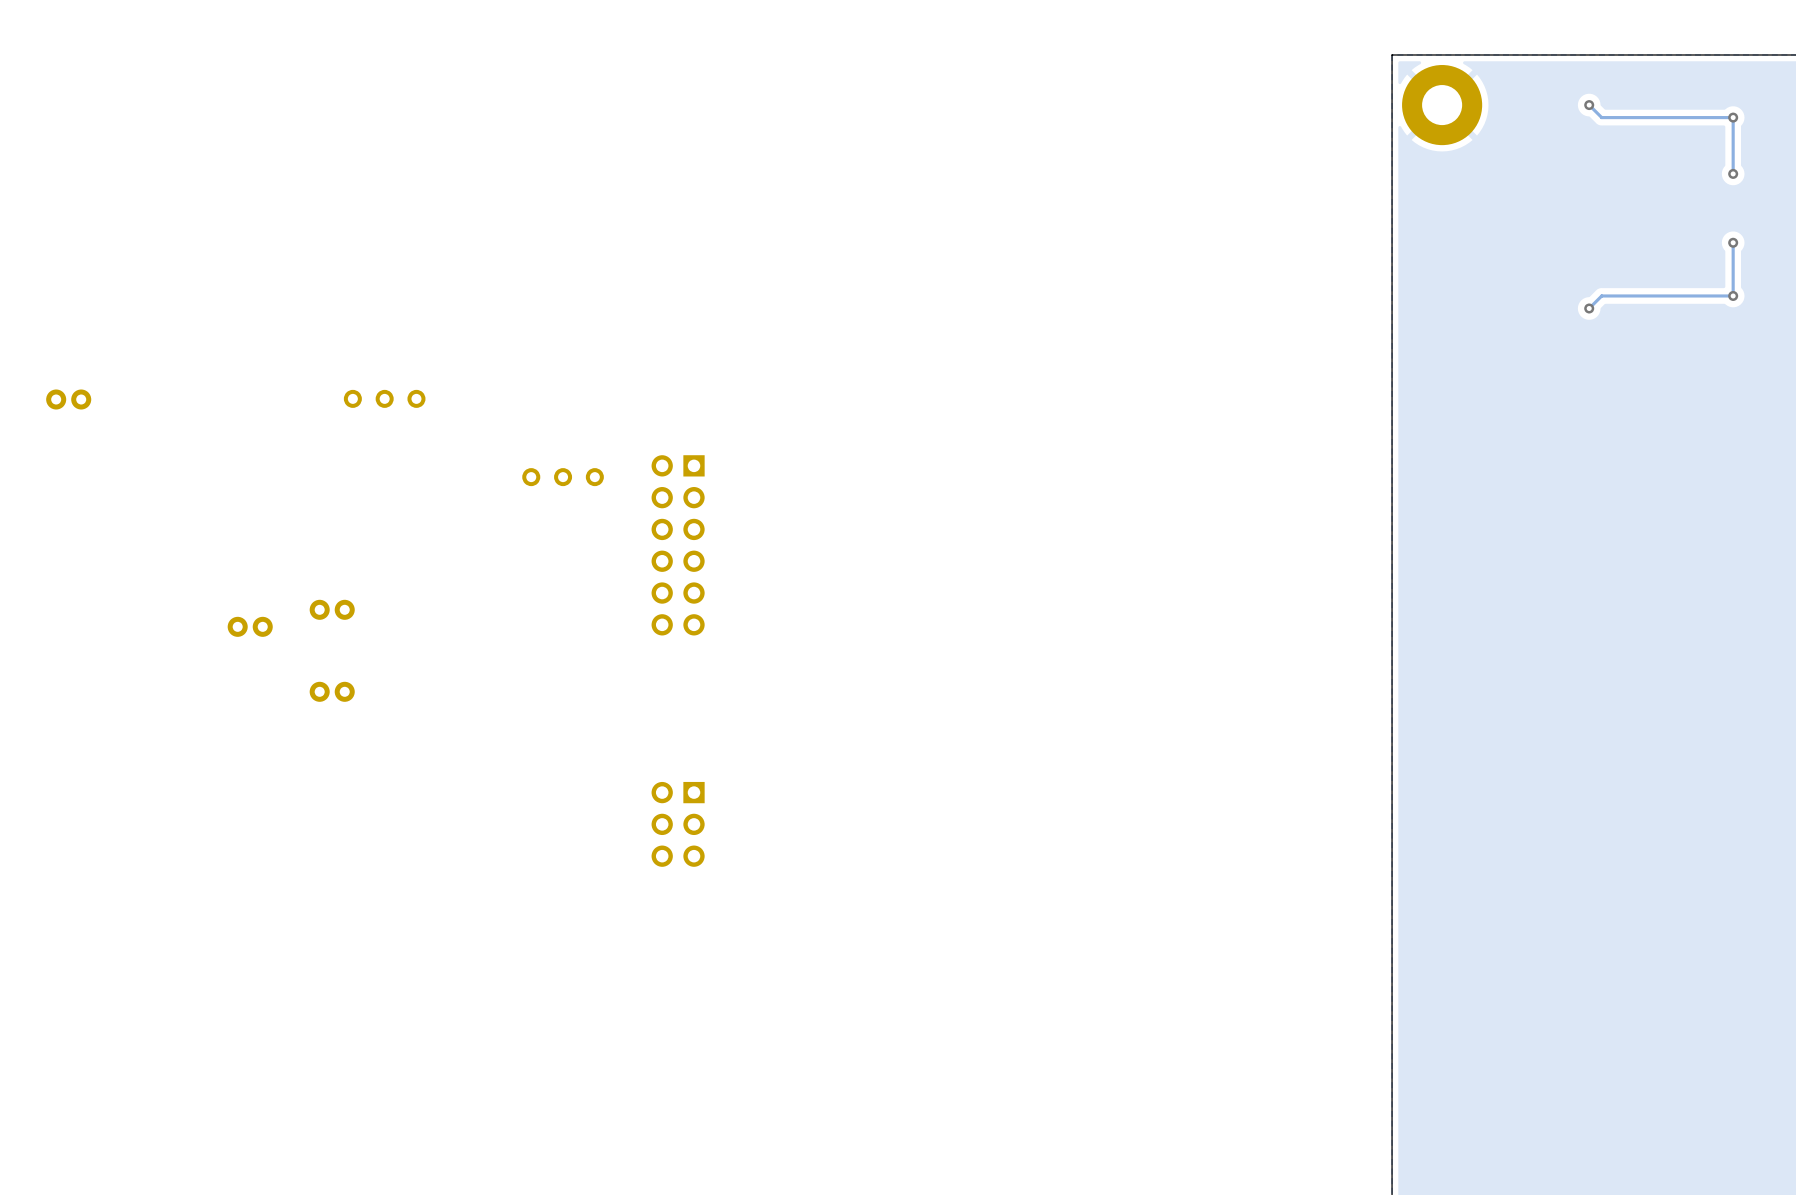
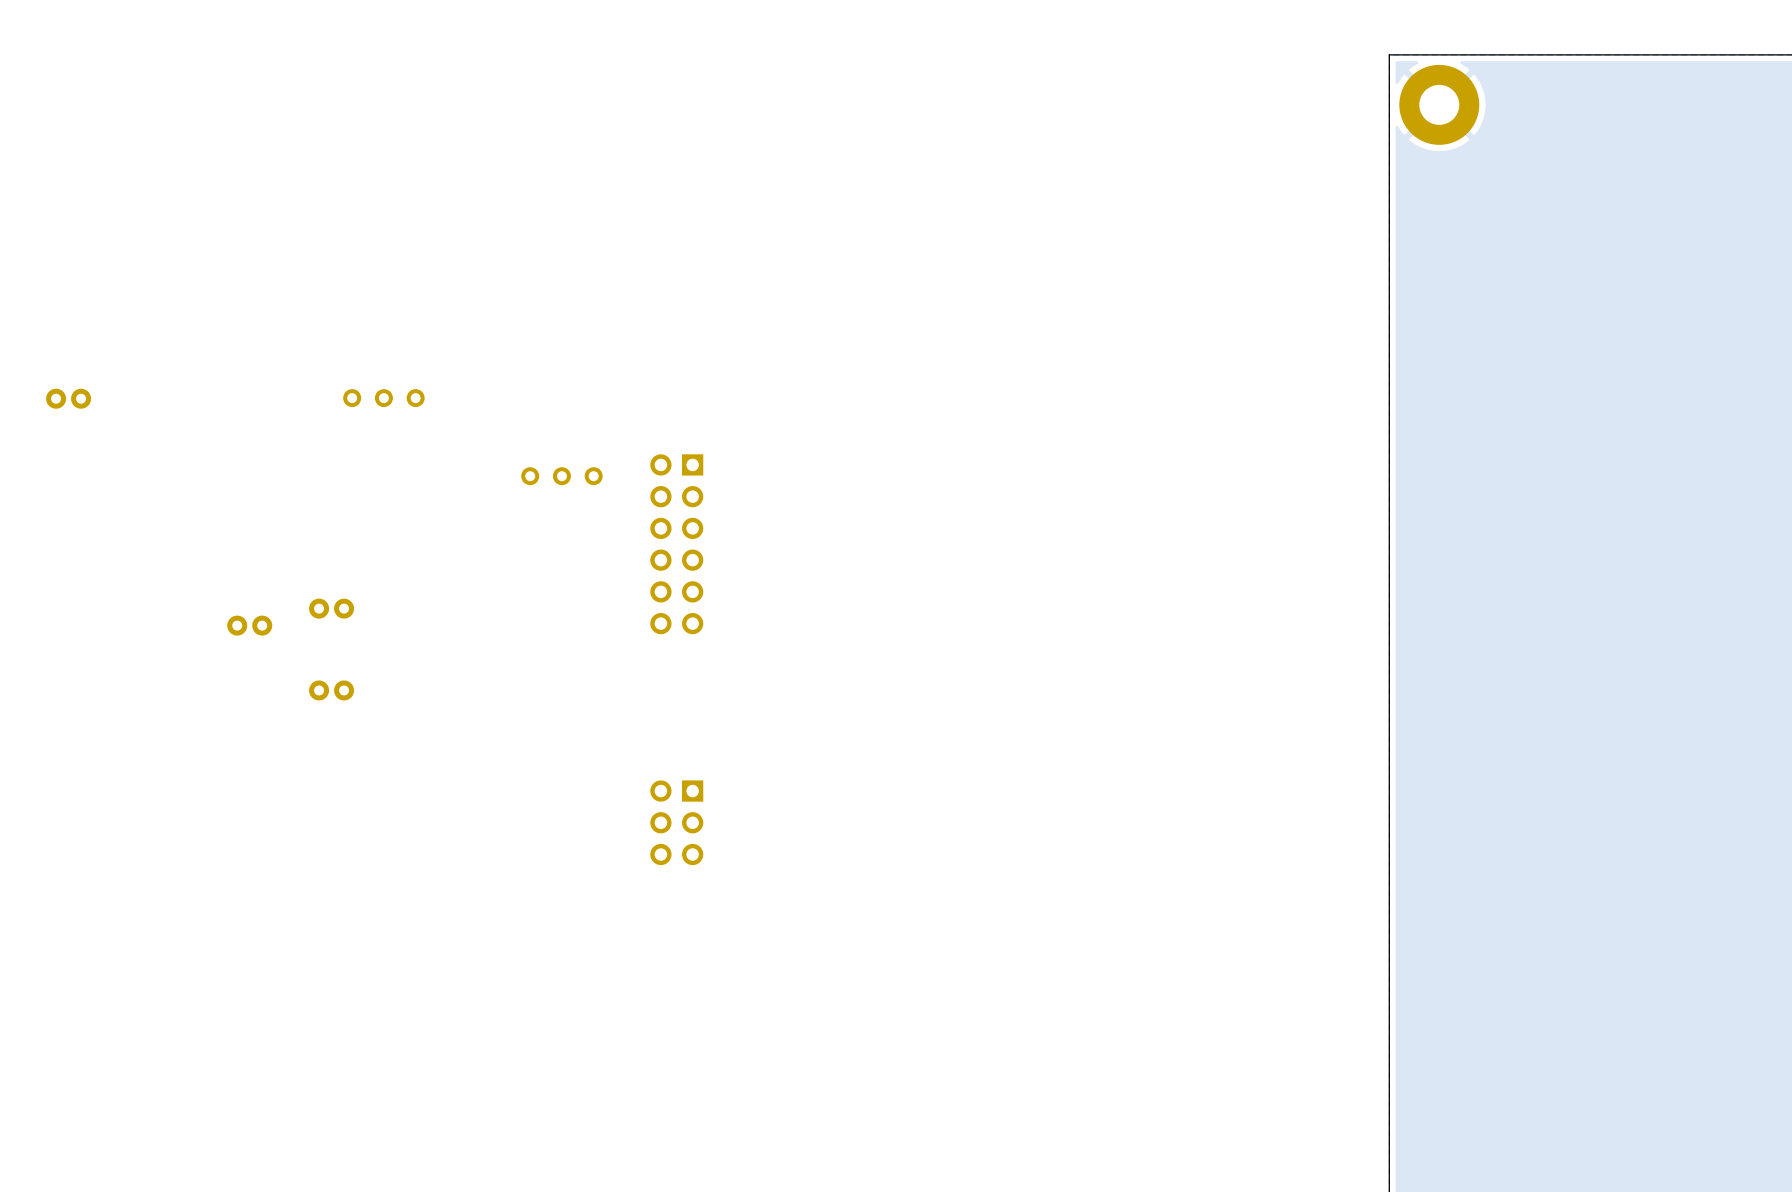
track: (1589, 105) (1601, 117) (1733, 117) (1733, 173) -> none
via: (1589, 105) -> none
via: (1733, 117) -> none
via: (1733, 173) -> none
track: (1733, 242) (1733, 295) (1601, 295) (1589, 308) -> none
via: (1733, 242) -> none
via: (1733, 295) -> none
via: (1589, 308) -> none

